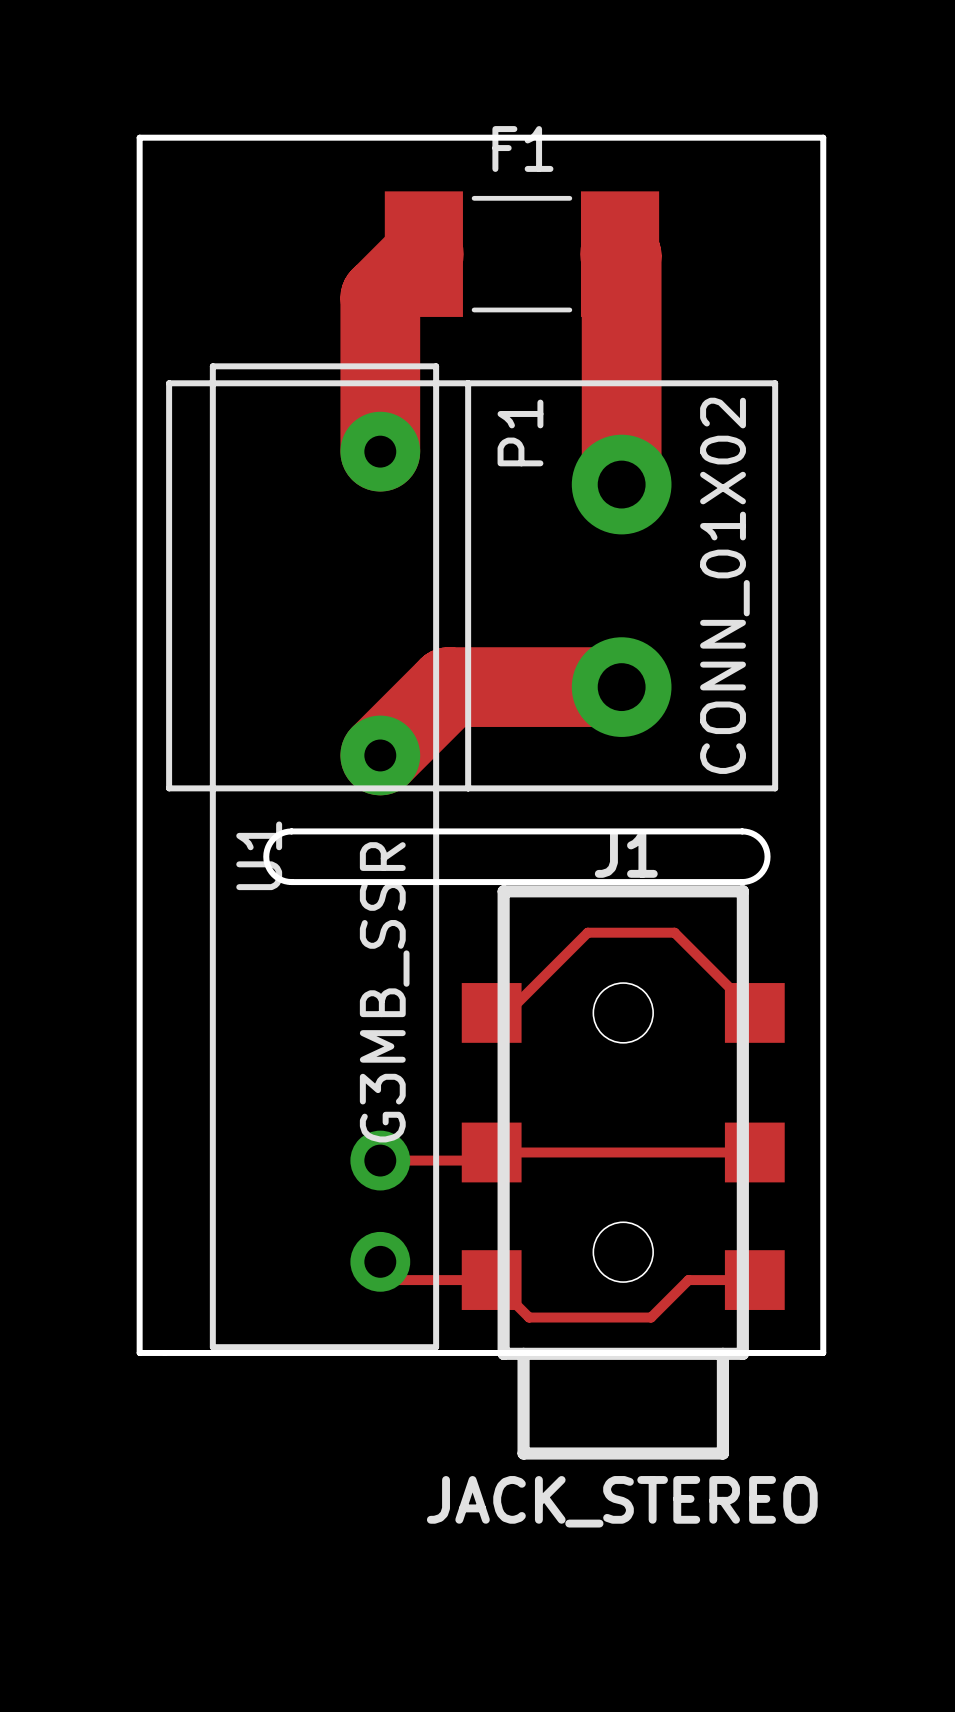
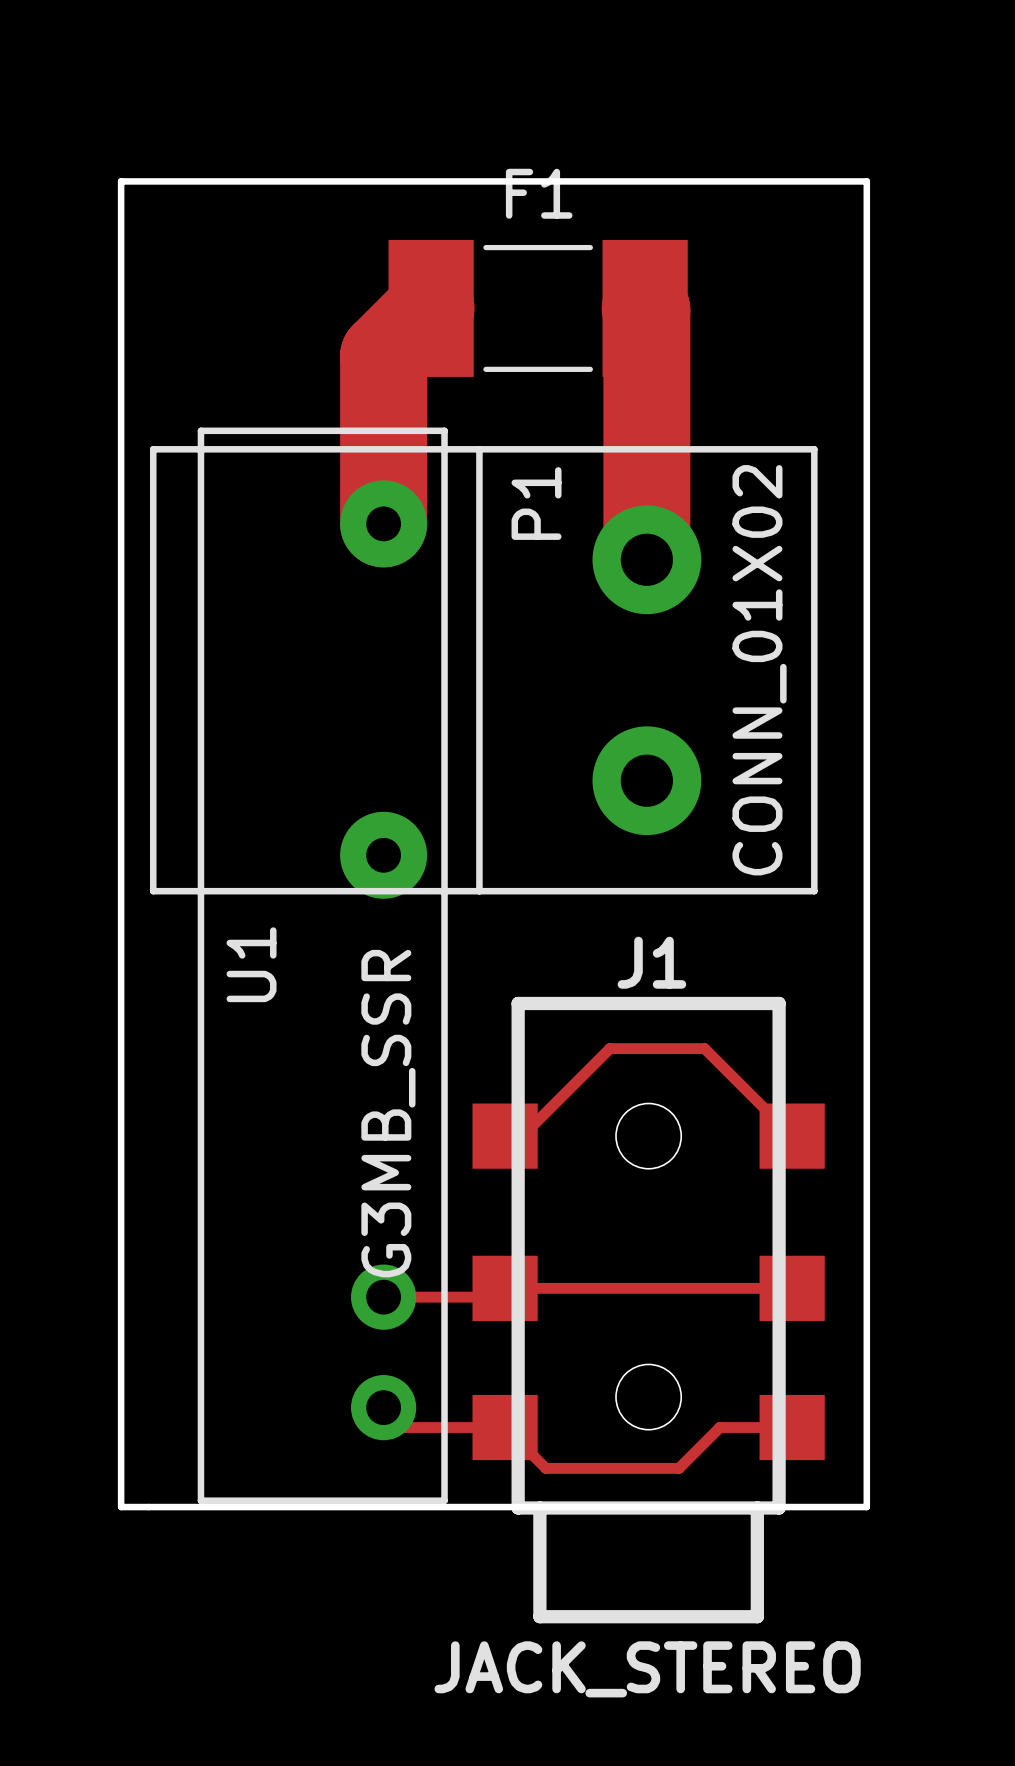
track: (621, 687) (448, 687) (380, 755) -> none
board edge: (291, 831) (742, 831) (751, 833) (760, 838) (765, 847) (767, 856) (765, 866) (760, 874) (751, 880) (742, 882) (291, 882) (281, 880) (273, 874) (268, 866) (266, 856) (268, 847) (273, 838) (281, 833) (291, 831) -> none

